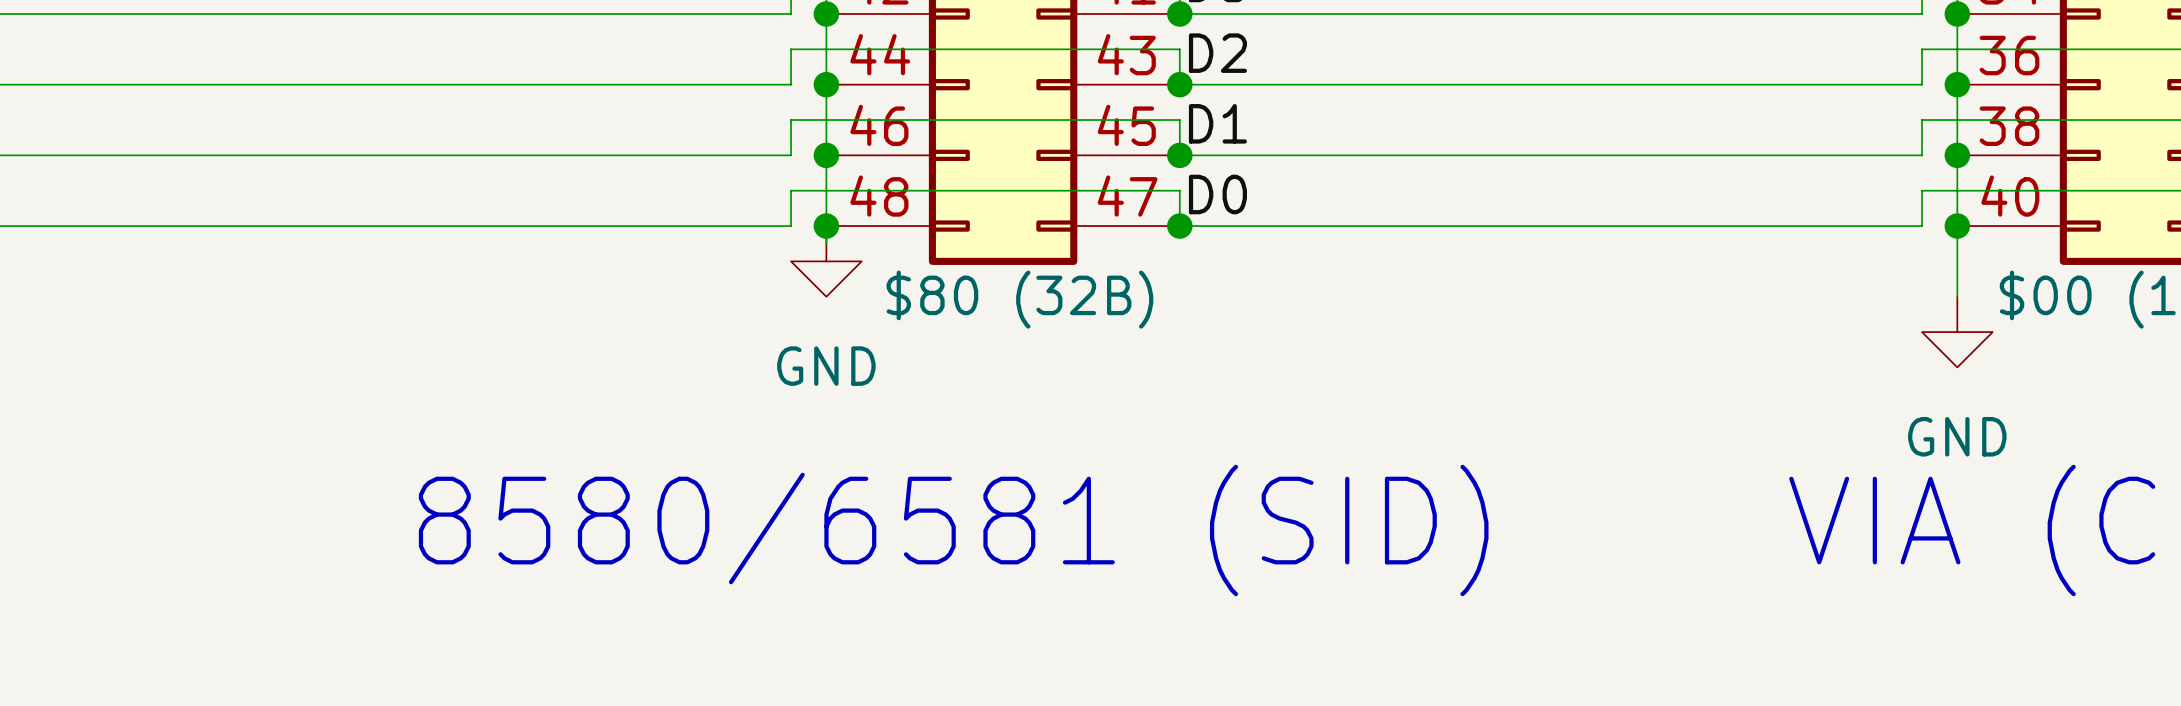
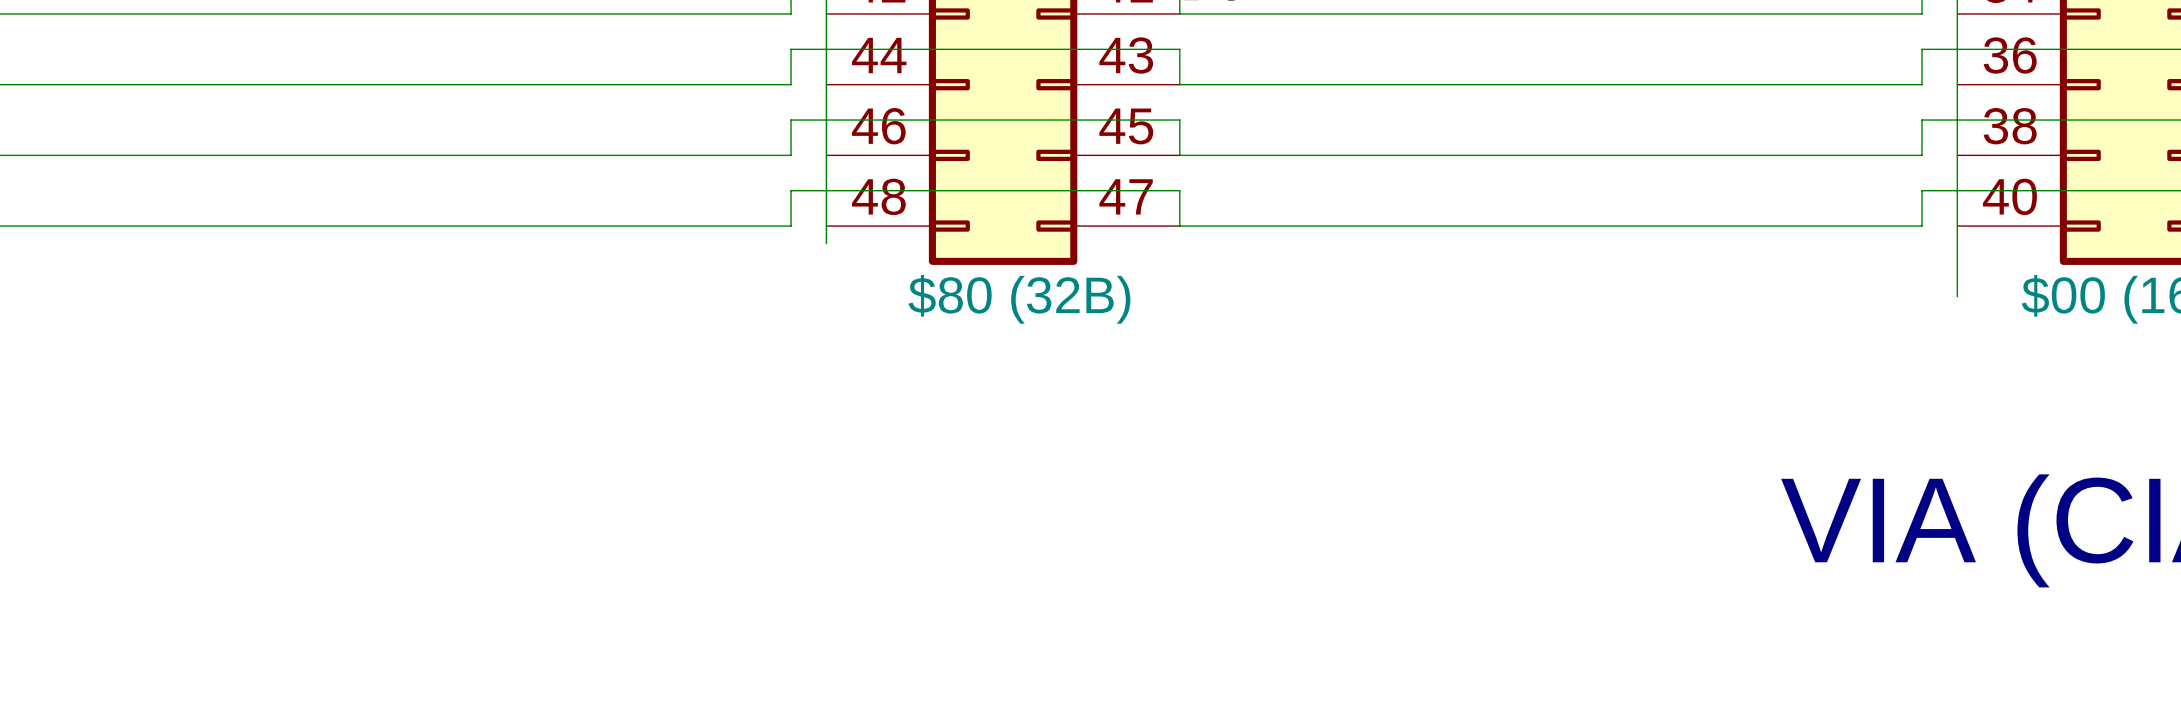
junction: (826, 13) -> none
junction: (1179, 13) -> none
junction: (1957, 13) -> none
label: D2 (1217, 53) -> none
junction: (826, 84) -> none
junction: (1179, 84) -> none
junction: (1957, 84) -> none
label: D1 (1217, 123) -> none
junction: (826, 155) -> none
junction: (1179, 155) -> none
junction: (1957, 155) -> none
label: D0 (1217, 194) -> none
junction: (826, 226) -> none
junction: (1179, 226) -> none
junction: (1957, 226) -> none
power symbol: GND (826, 261) -> none
power symbol: GND (1957, 332) -> none
text: 8580/6581 (SID) (953, 530) -> none

